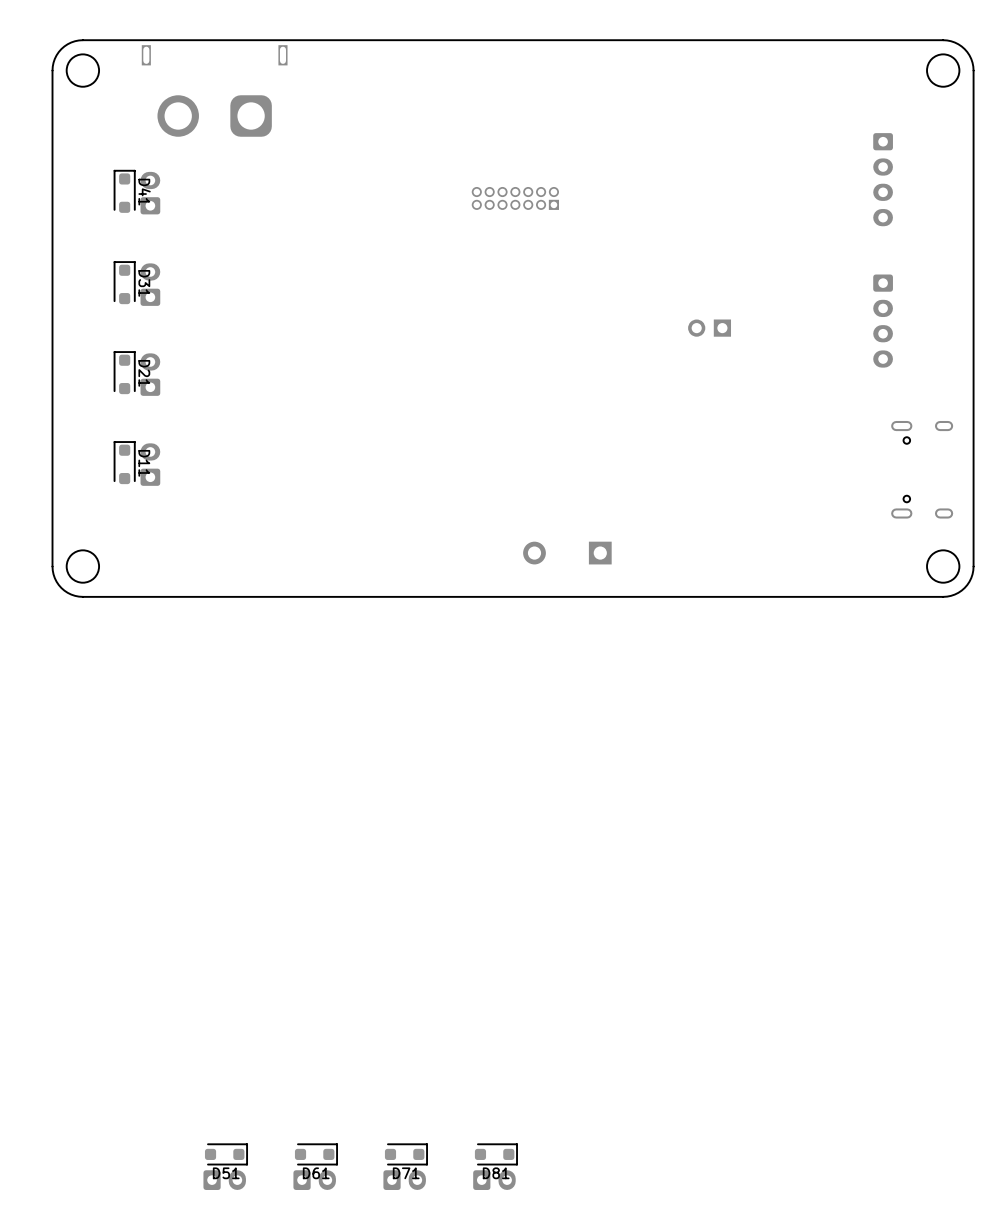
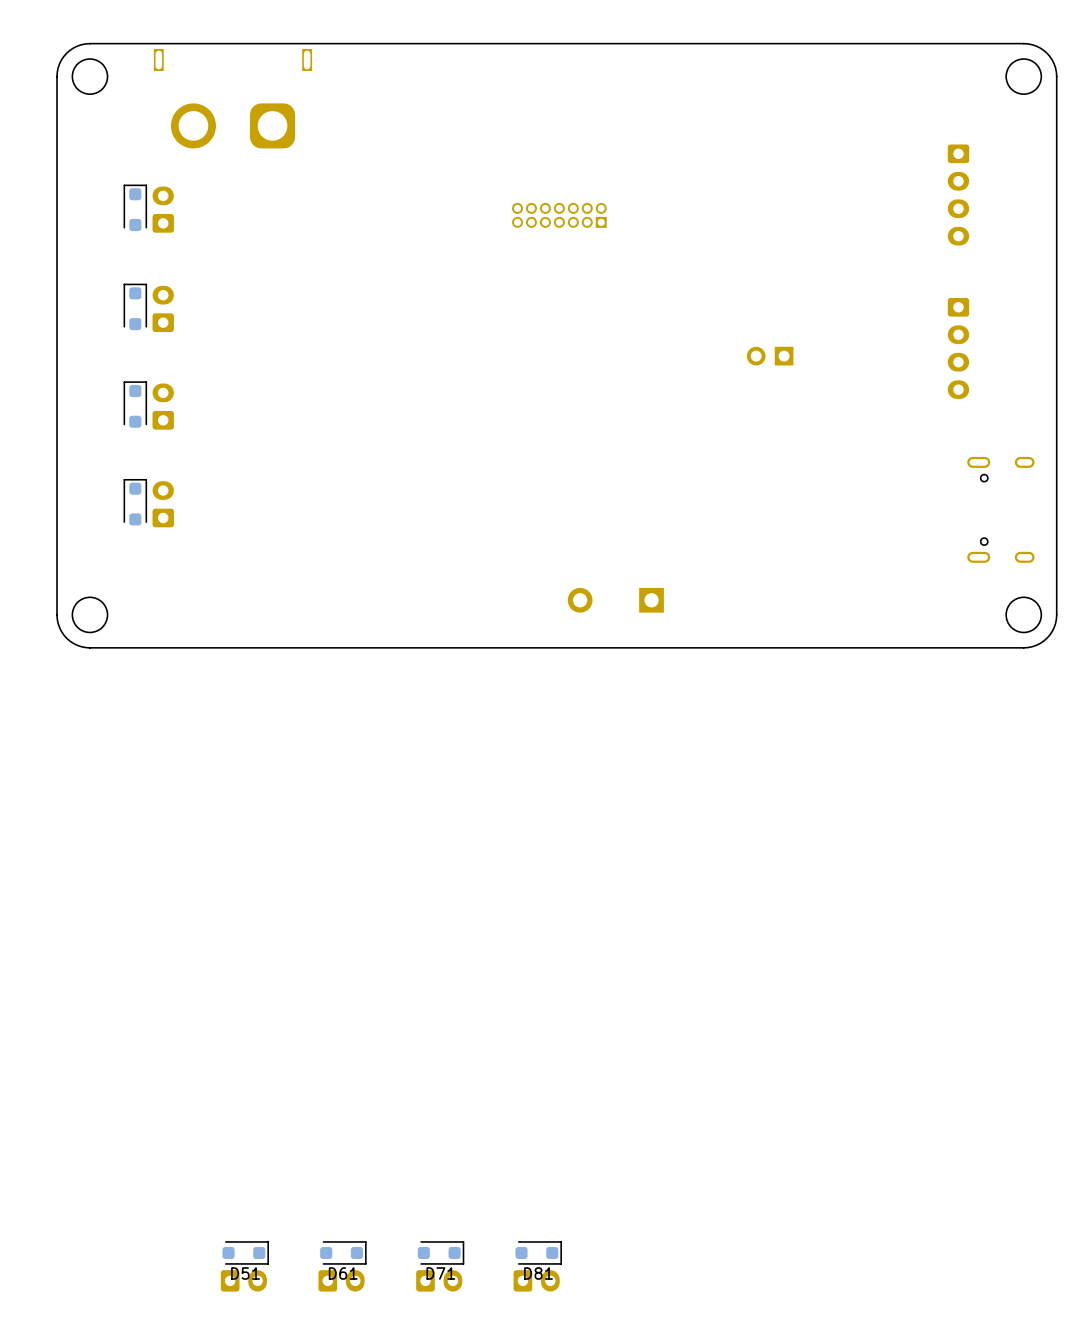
D41 name: D41 (144, 192) -> none
D31 name: D31 (144, 283) -> none
D21 name: D21 (144, 373) -> none
D11 name: D11 (144, 463) -> none

